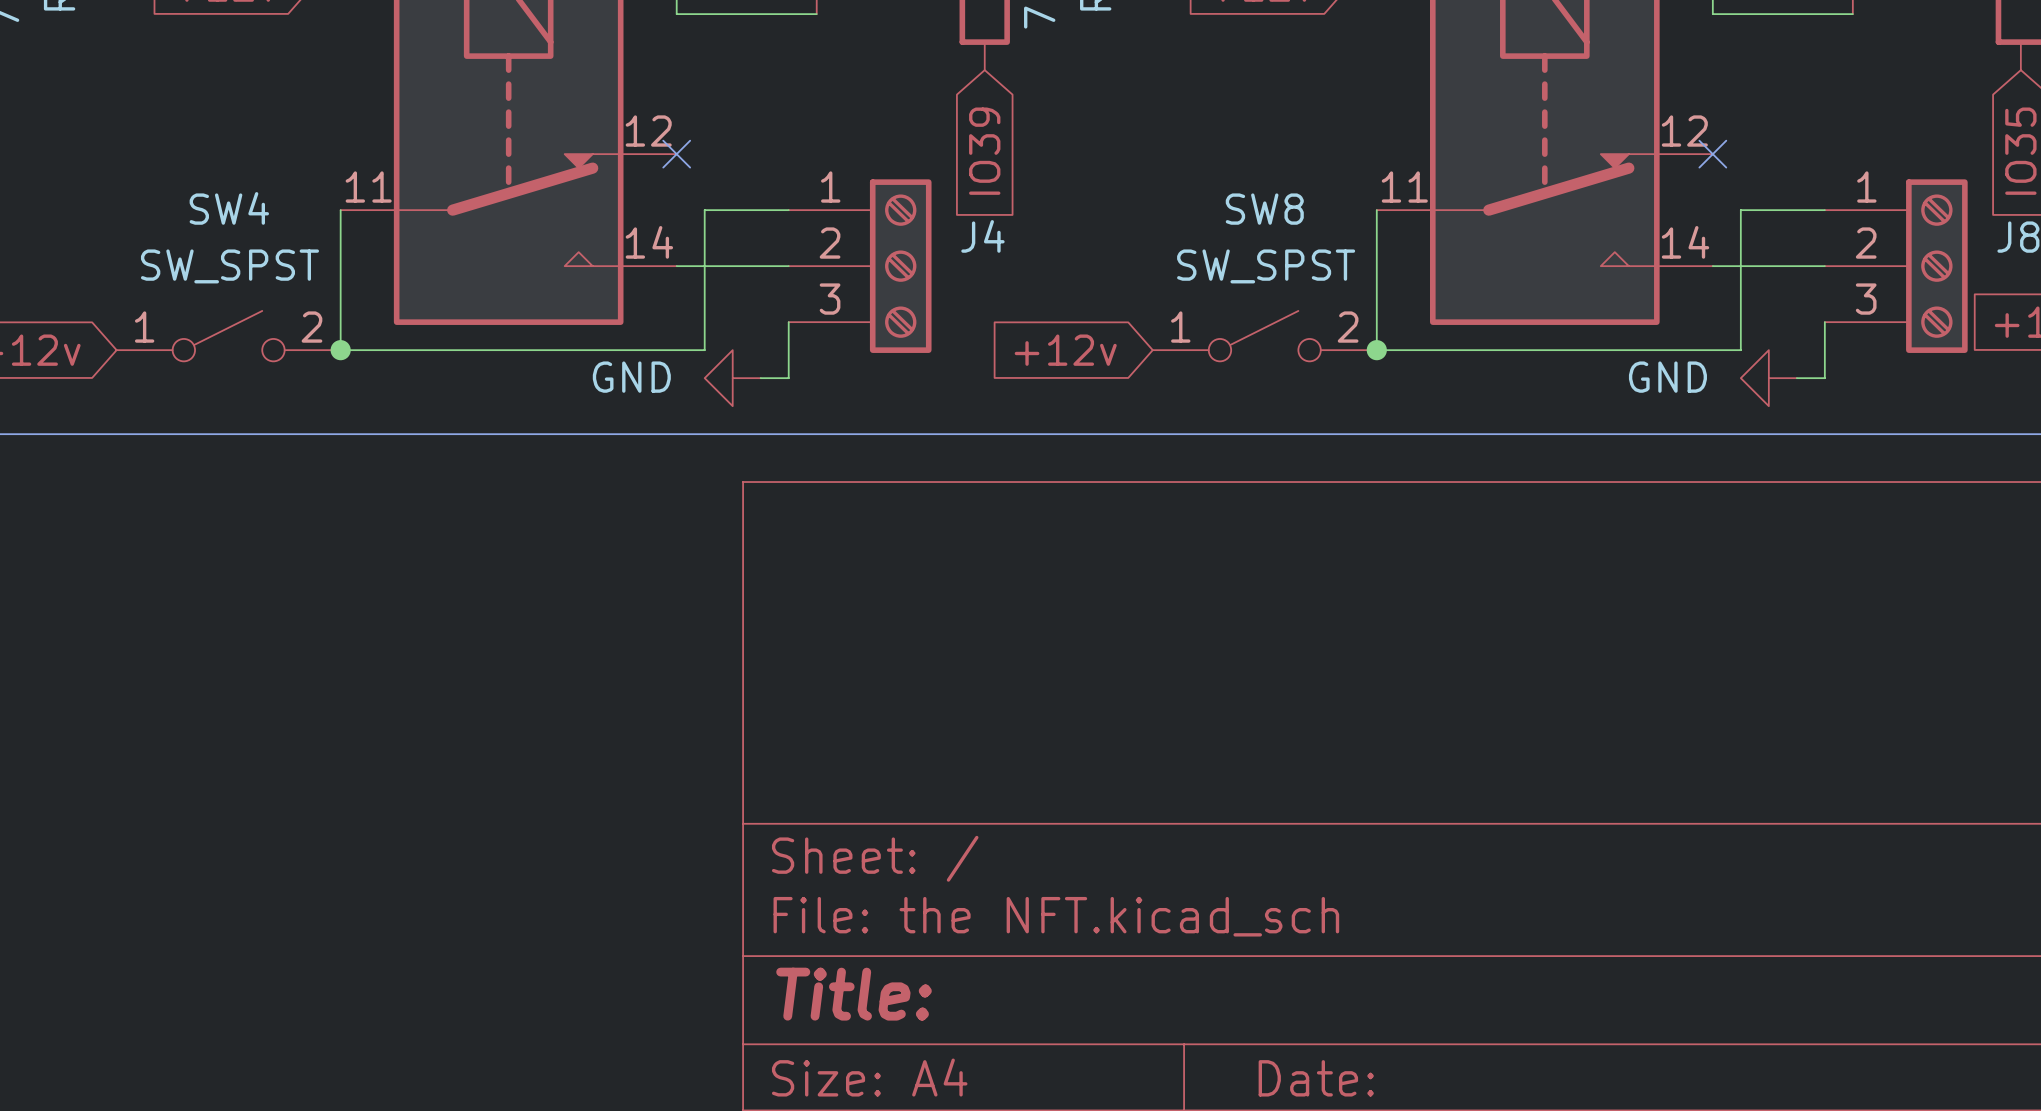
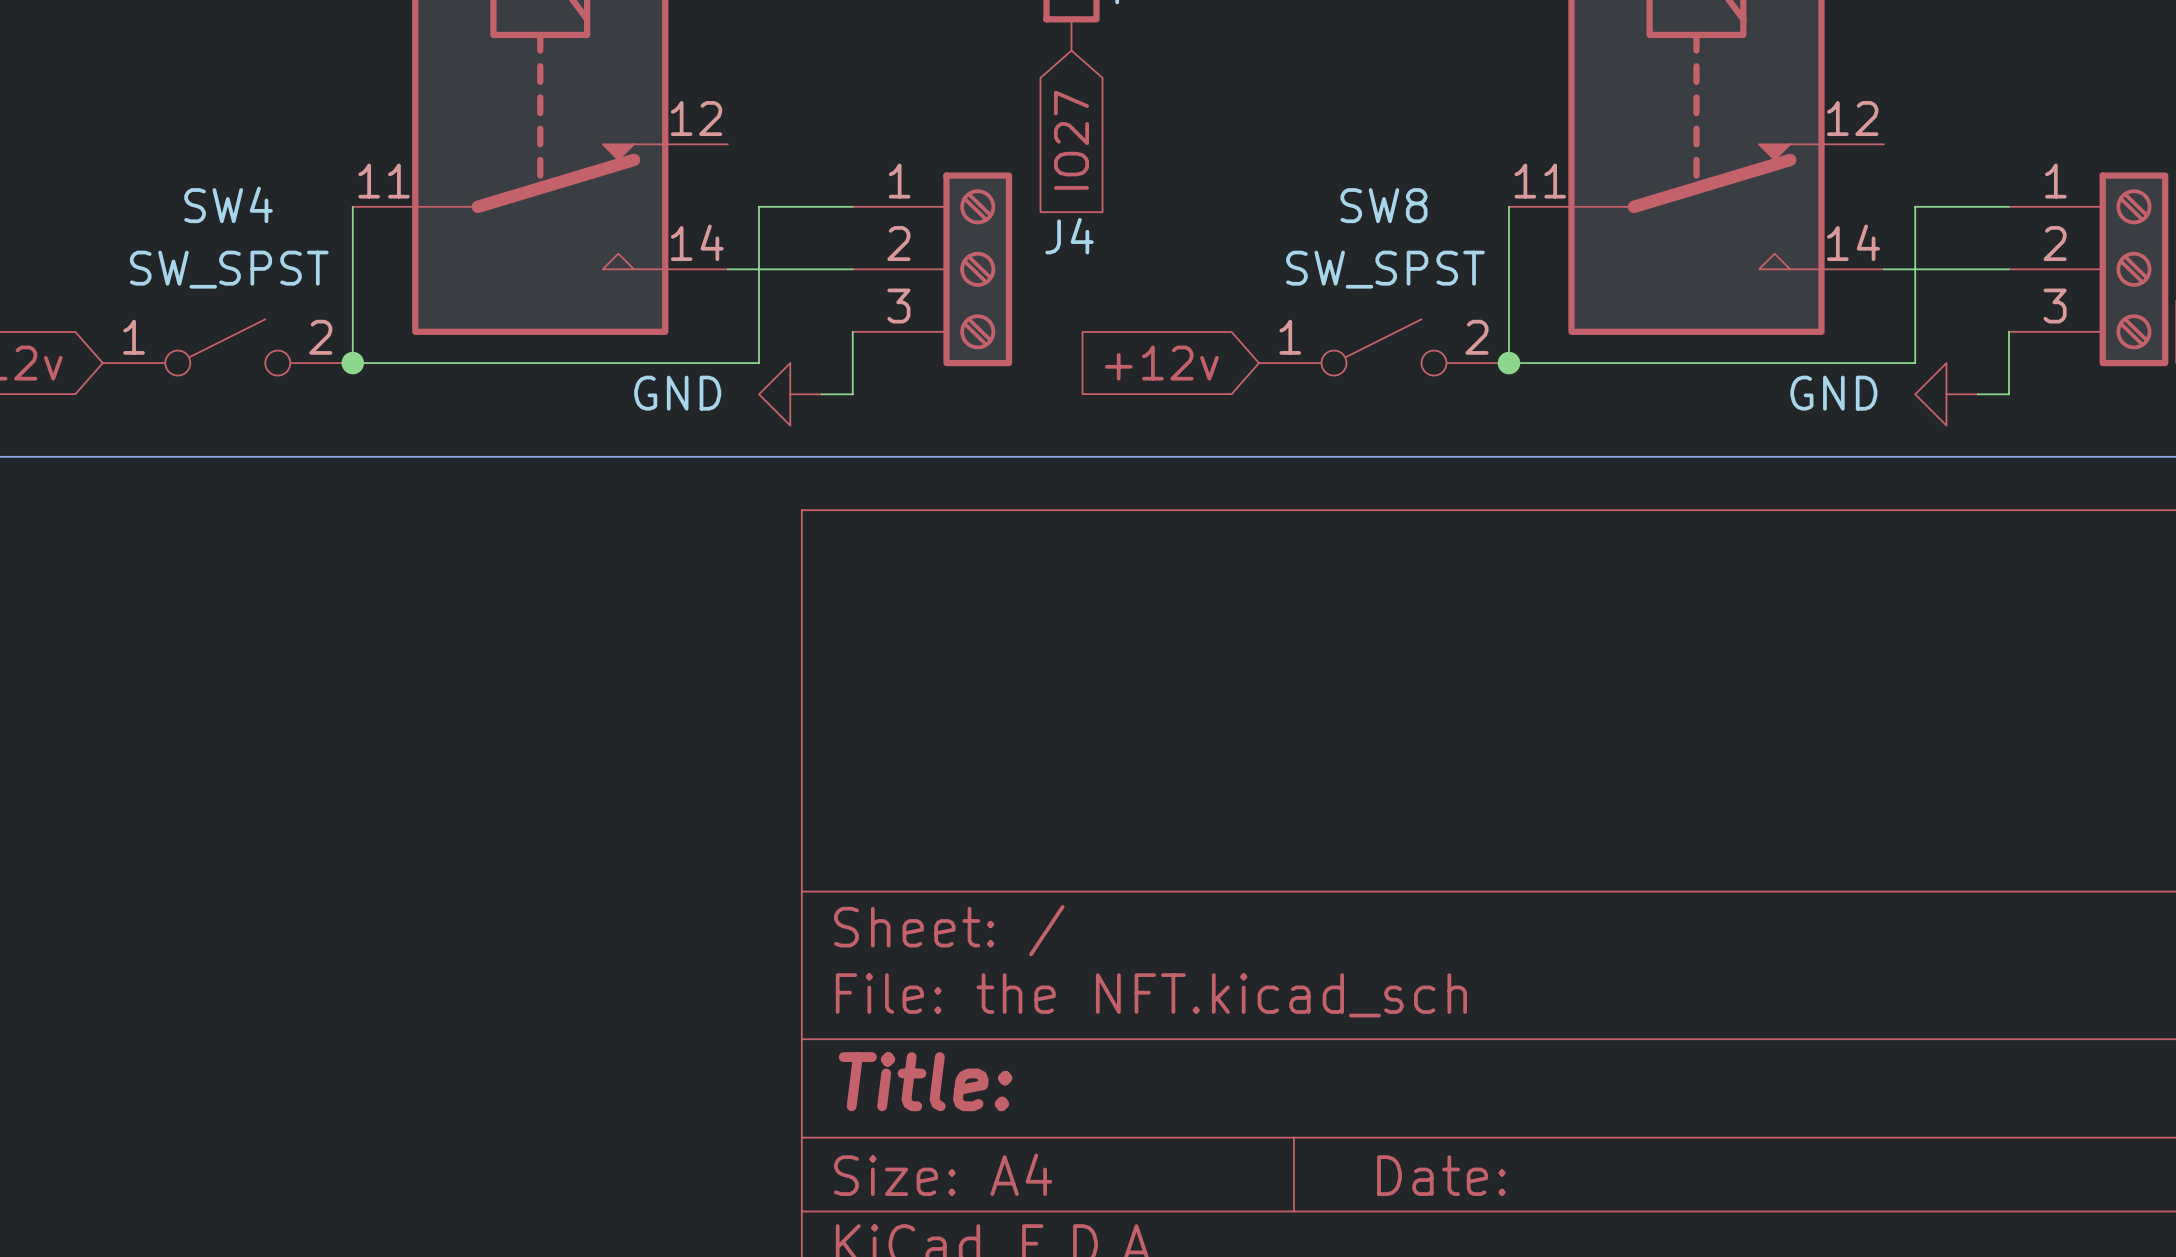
global label: IO39 (984, 151) -> IO27 (1071, 140)
no-connect mark: (676, 154) -> none
no-connect mark: (1712, 154) -> none

